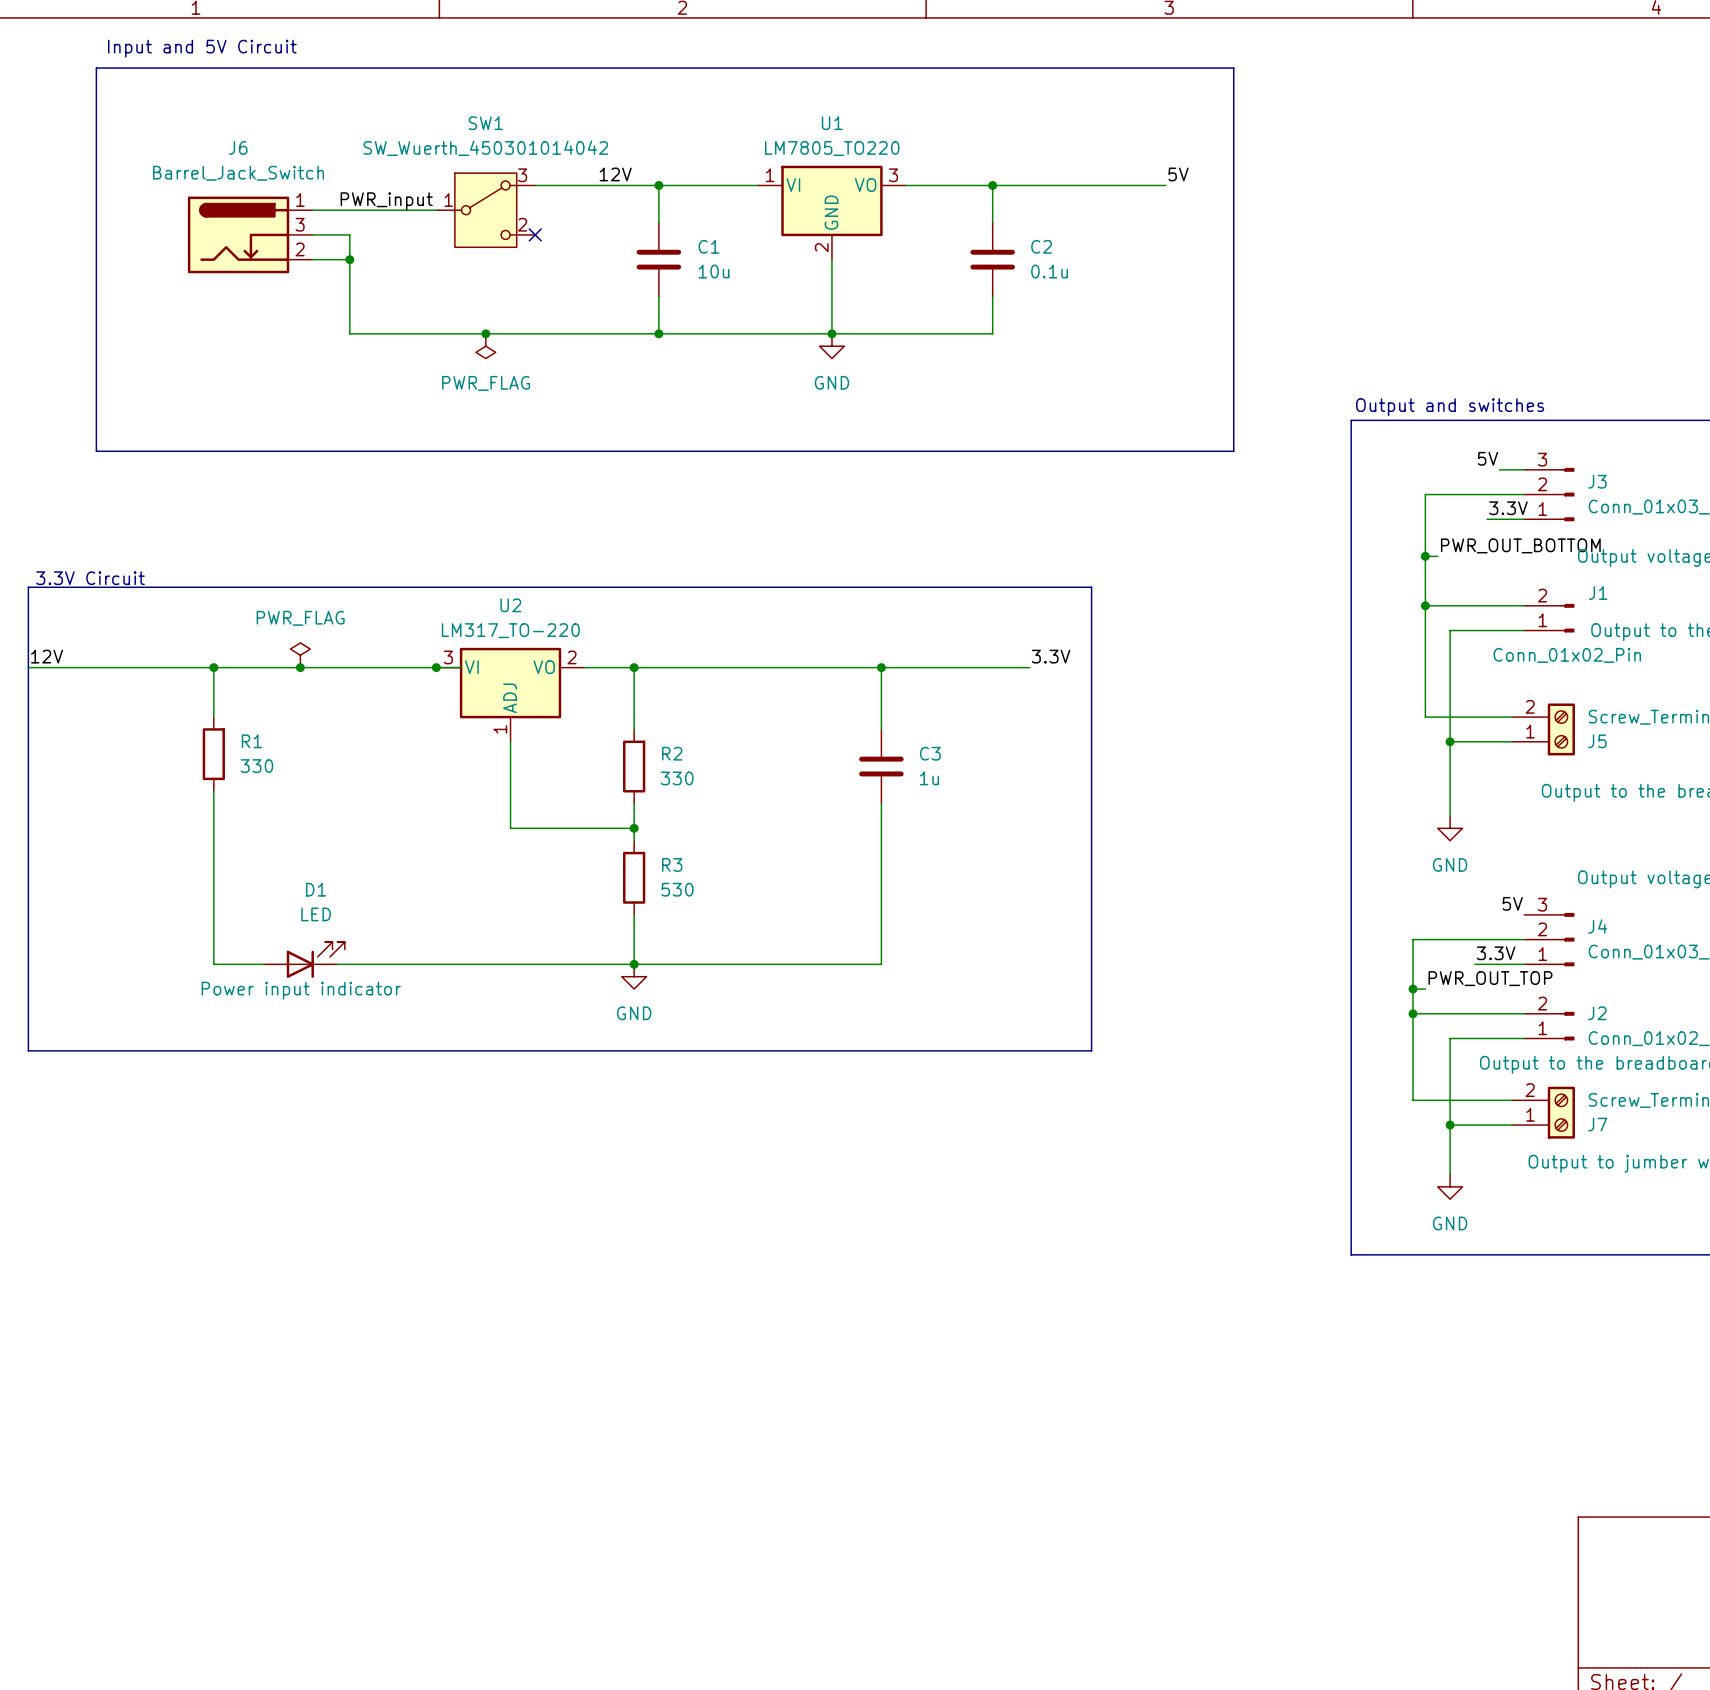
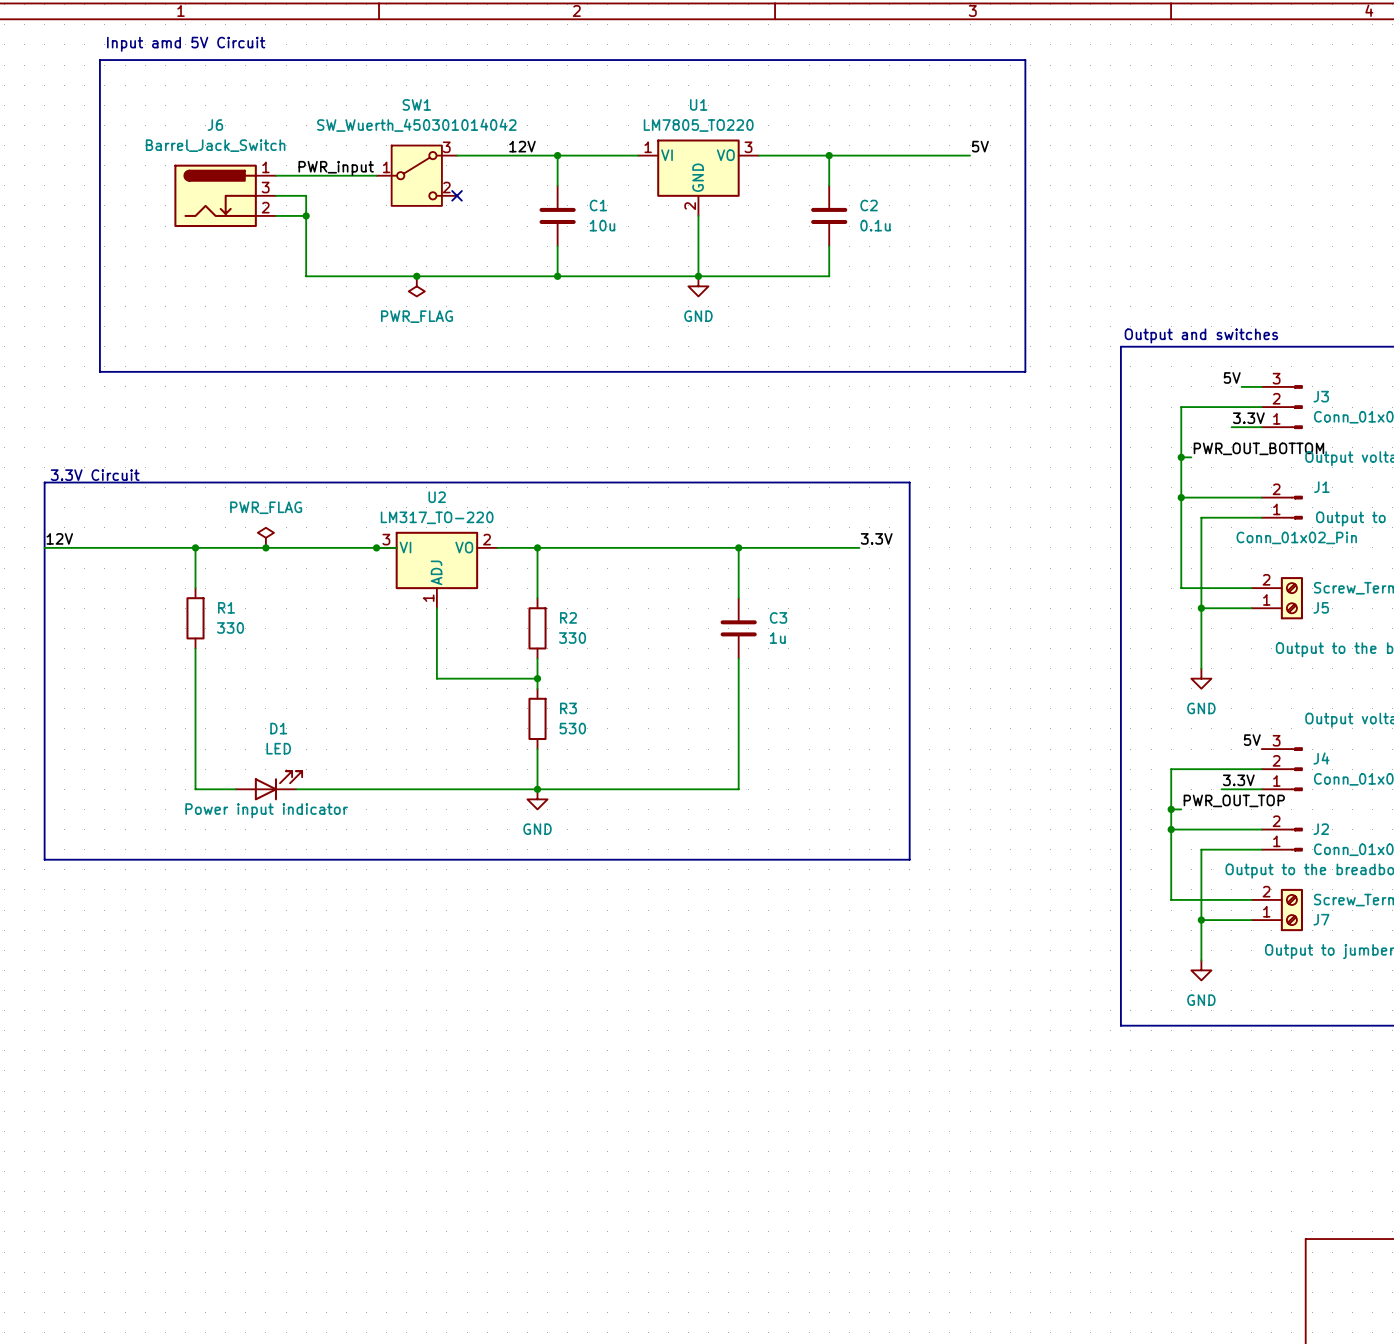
text: Input and 5V Circuit (202, 48) -> Input amd 5V Circuit (186, 44)

